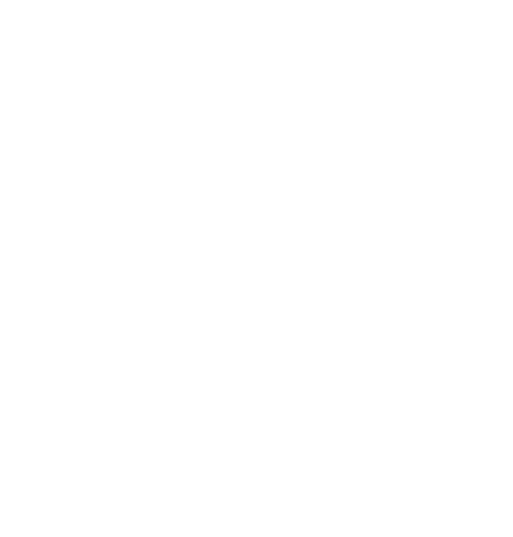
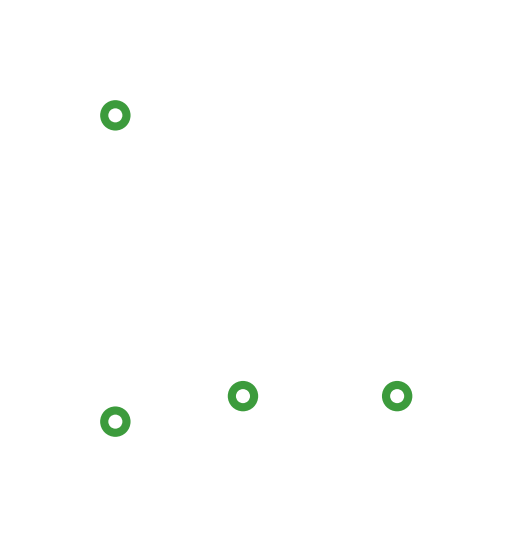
via: none -> (115, 115)
via: none -> (242, 396)
via: none -> (397, 396)
via: none -> (115, 421)

